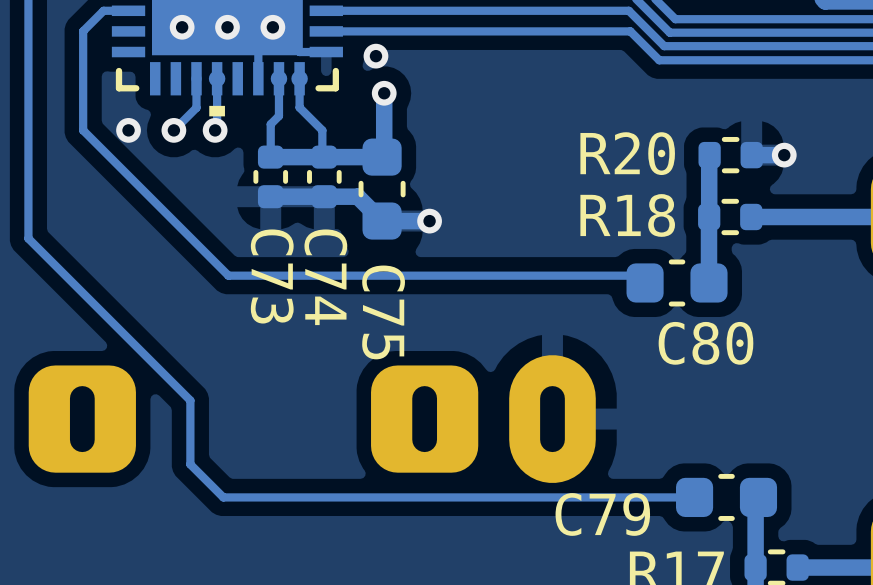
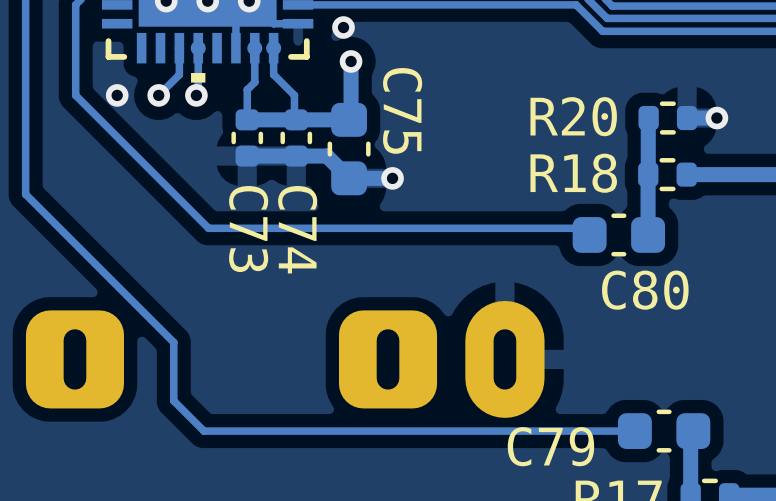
C75 name position: C75 (383, 312) -> C75 (402, 110)

